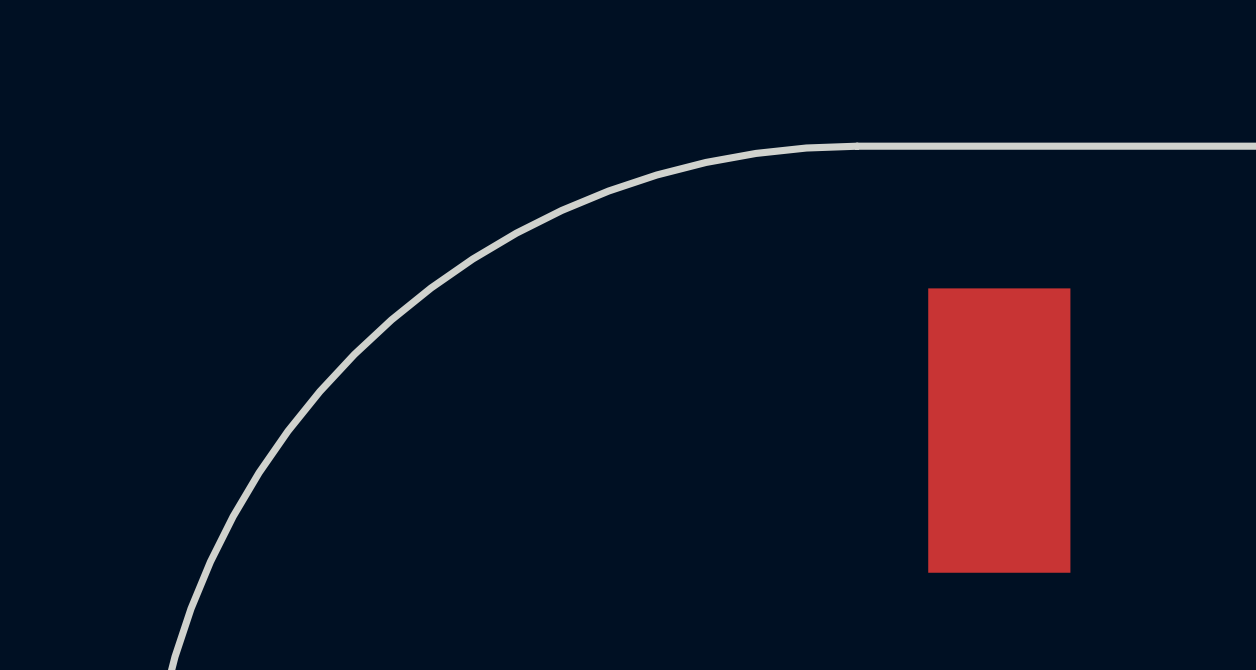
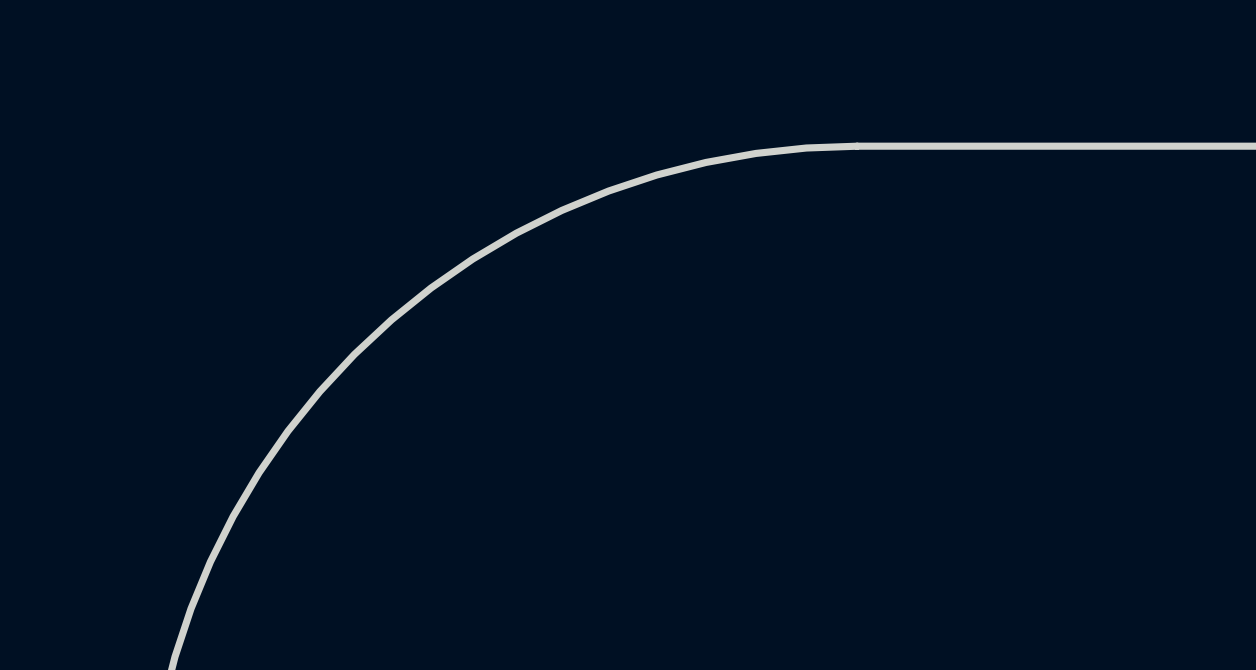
part: (999, 430) -> none

